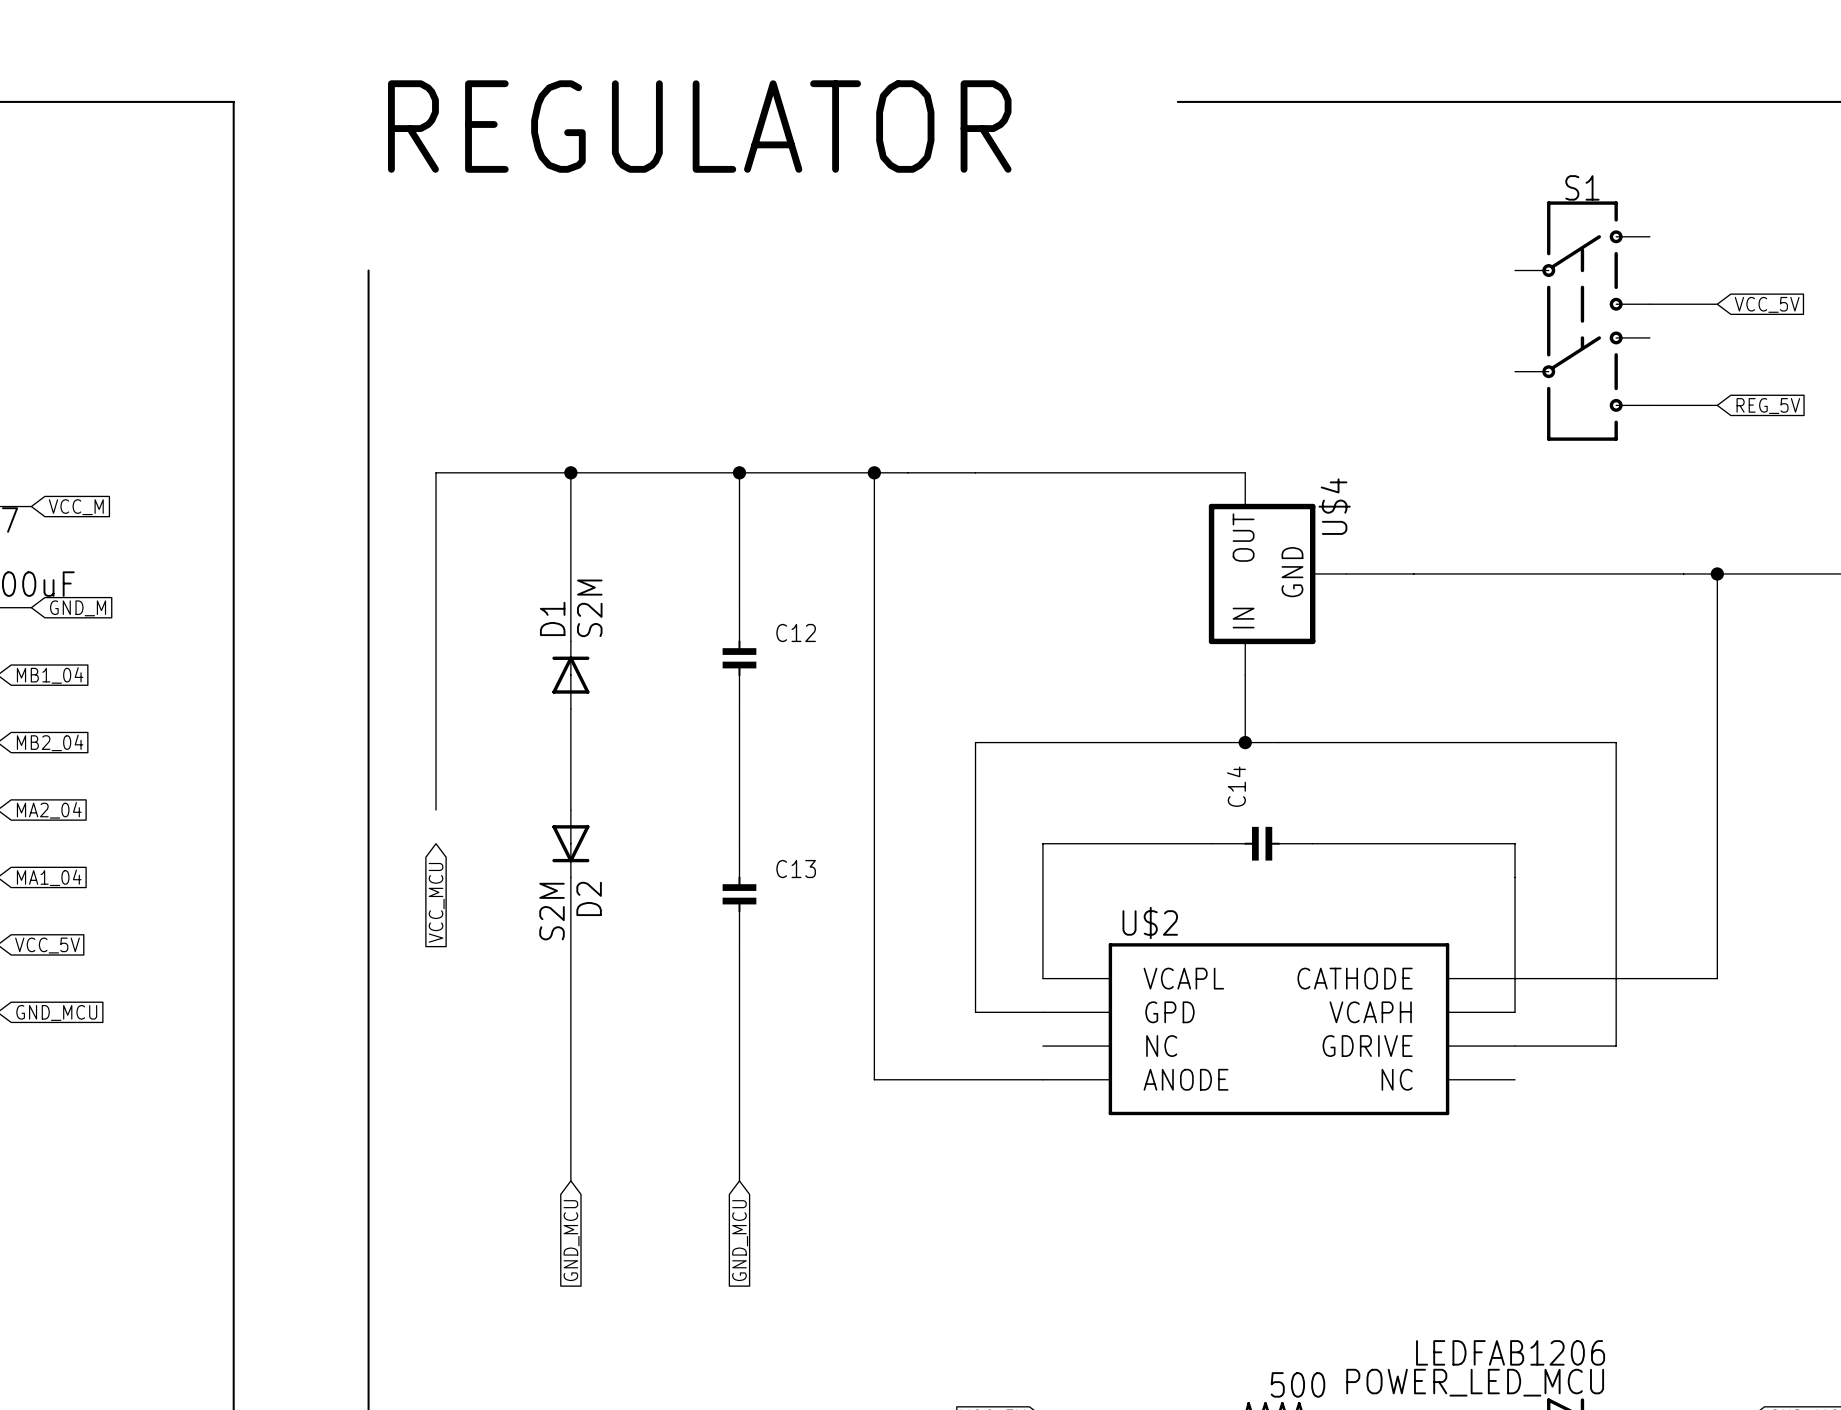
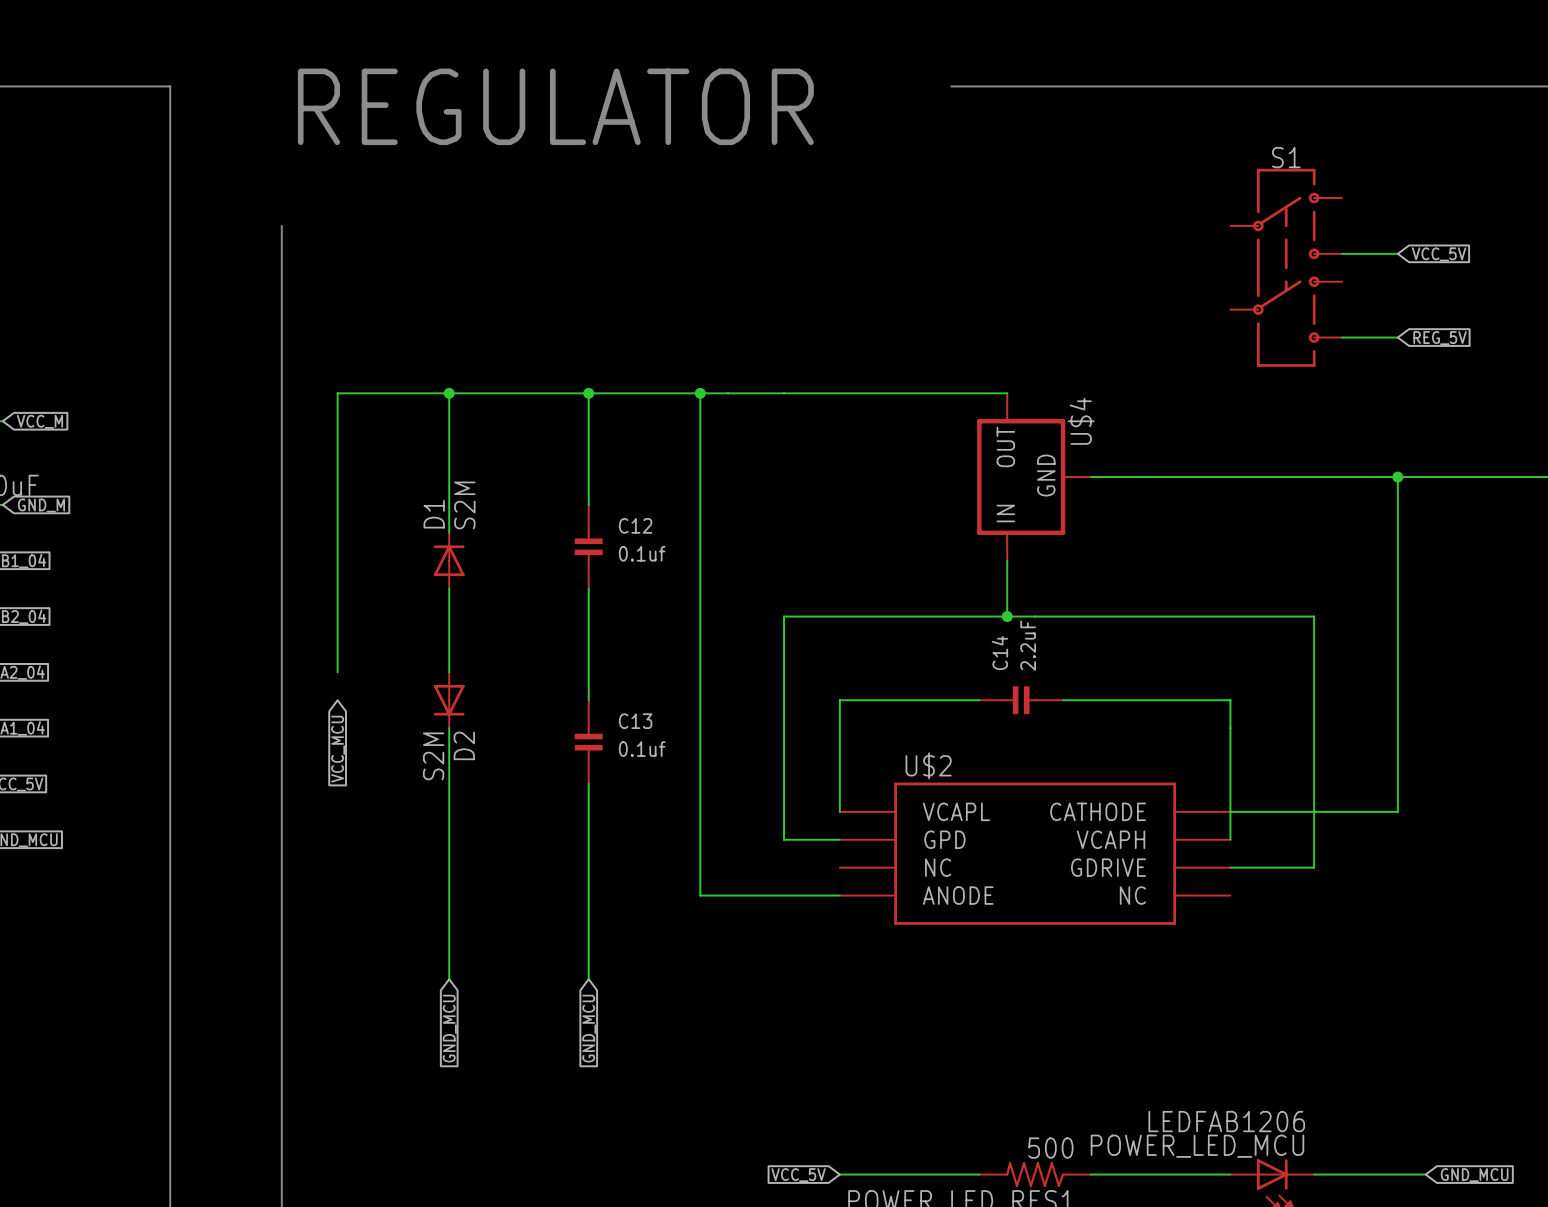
C12 value: none -> 0.1uf (642, 553)
C14 value: none -> 2.2uF (1028, 645)
C13 value: none -> 0.1uf (642, 749)

